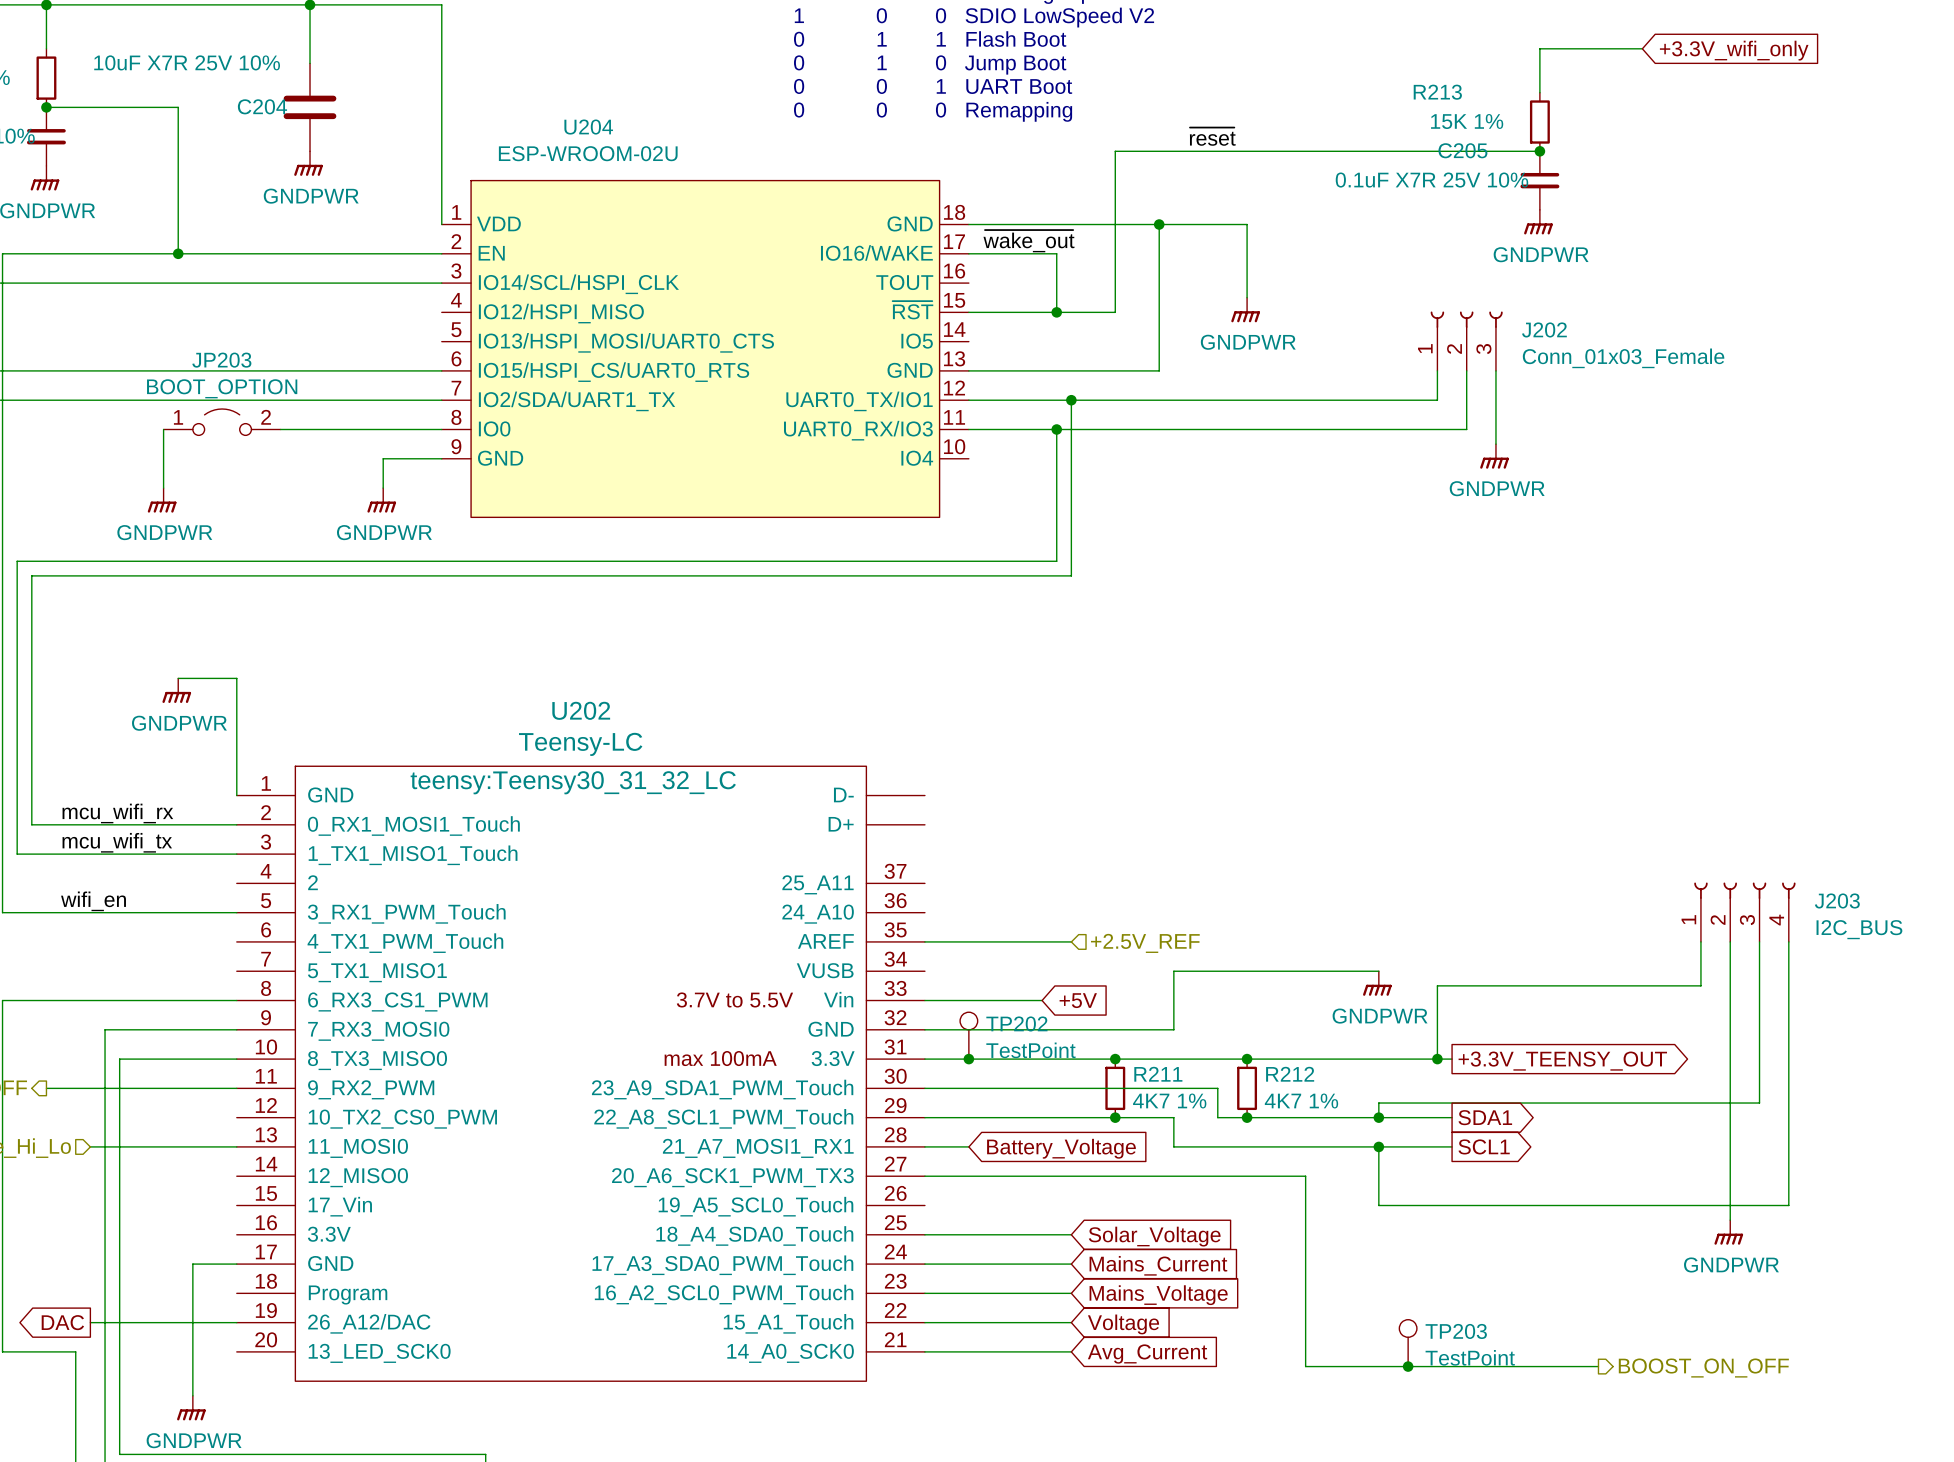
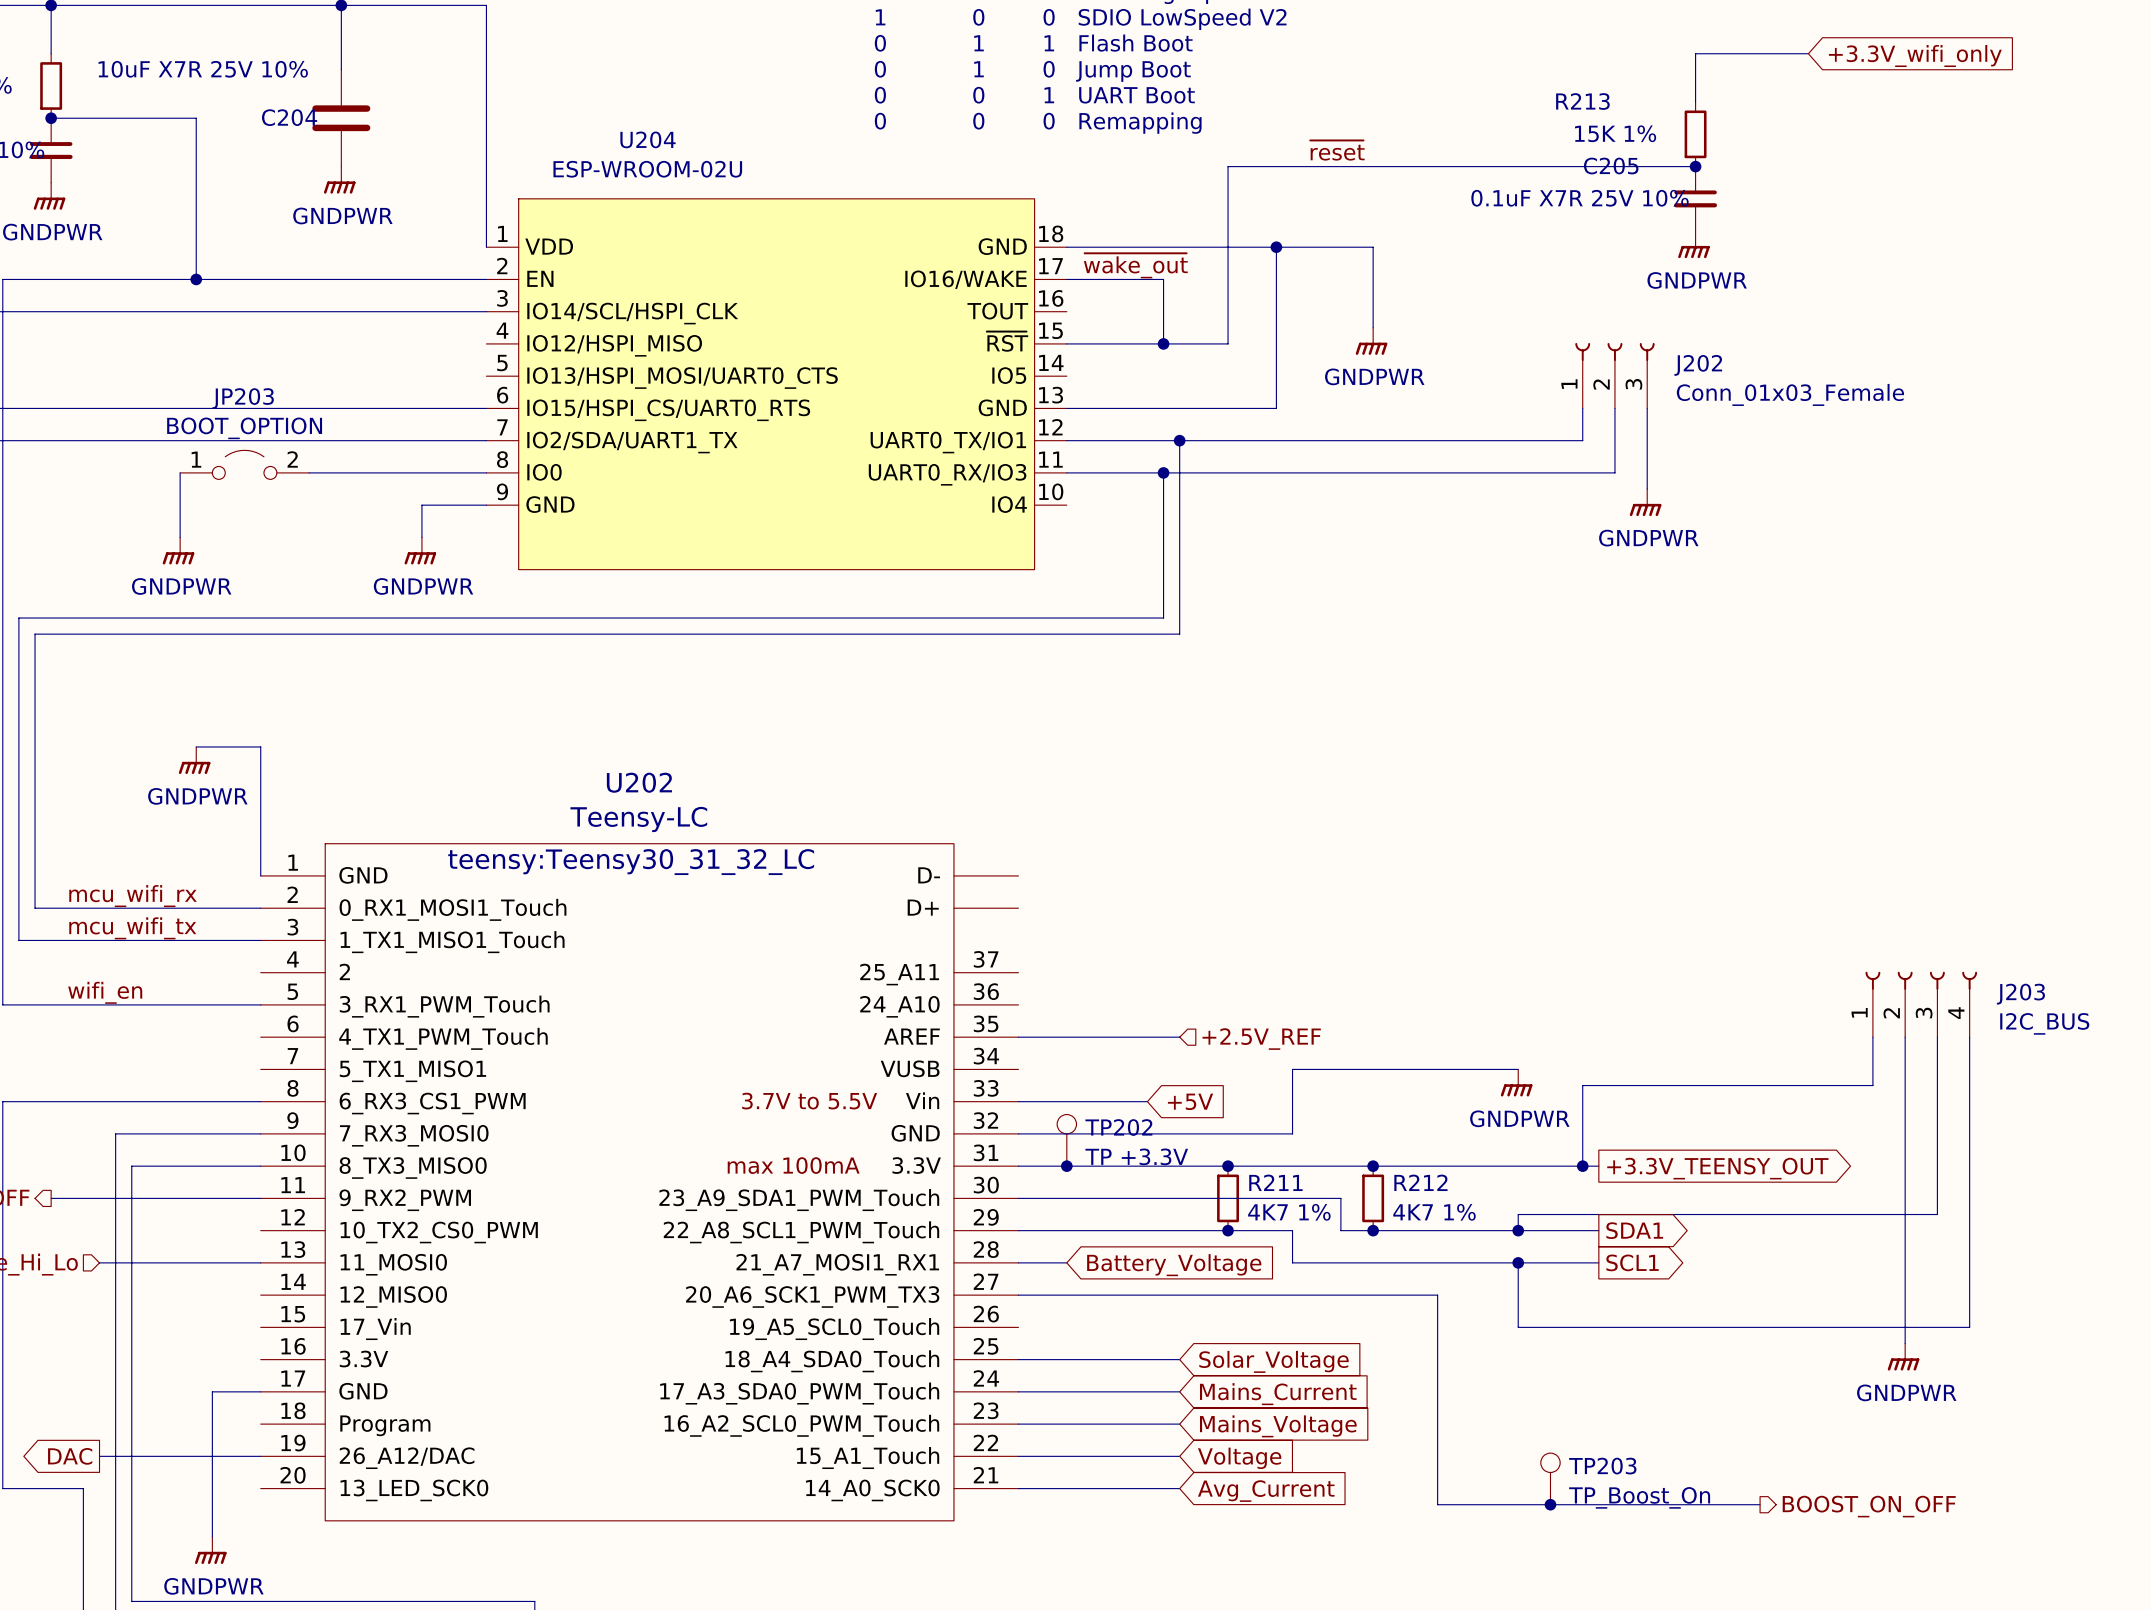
TP202 value: TestPoint (1030, 1050) -> TP +3.3V (1136, 1156)
TP203 value: TestPoint (1470, 1357) -> TP_Boost_On (1639, 1497)

